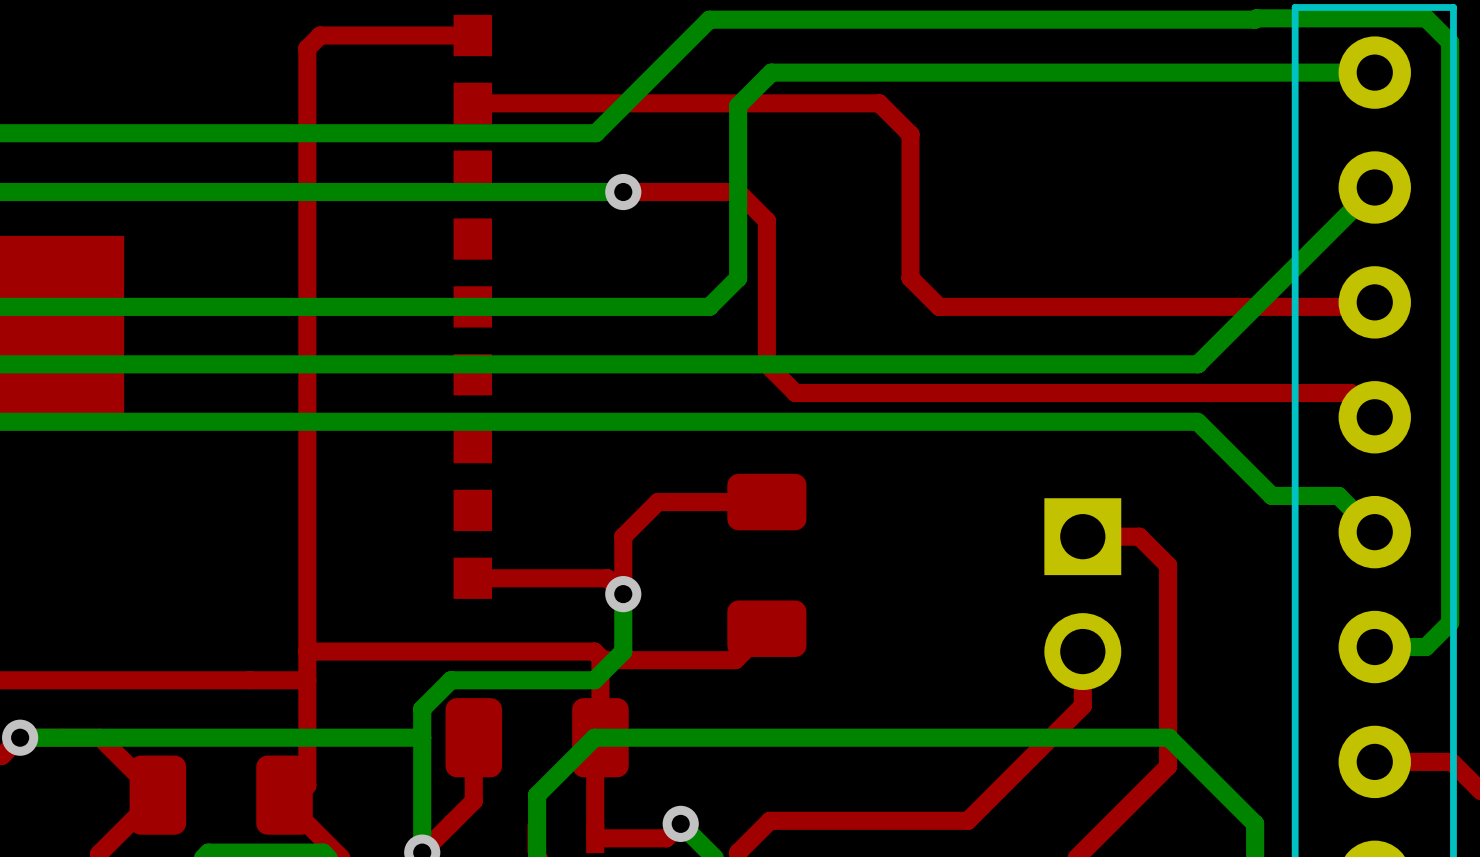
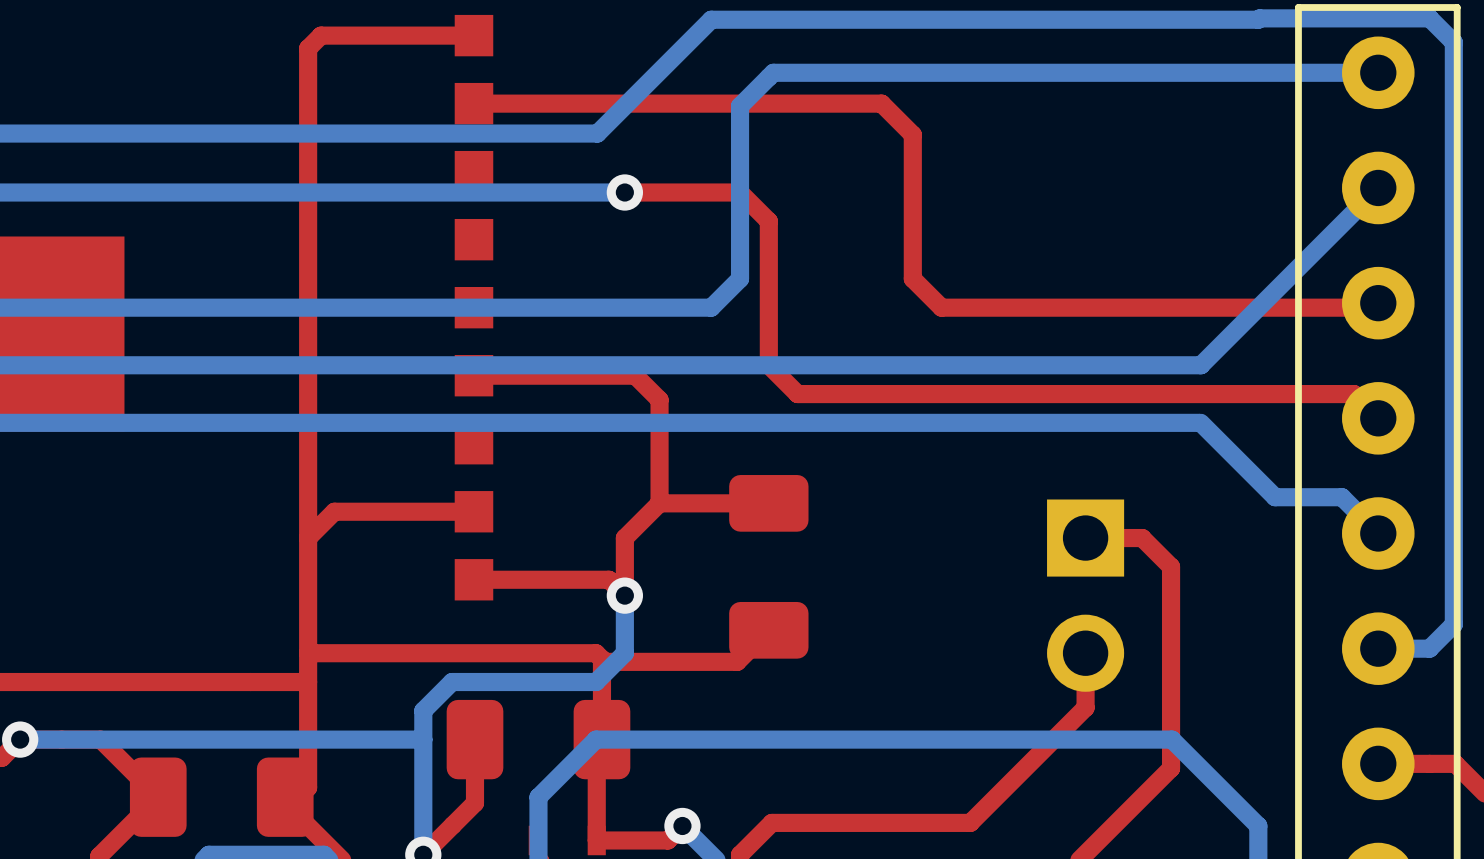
top track: none -> (473, 375) (635, 375) (659, 399) (659, 503)
top track: none -> (473, 511) (334, 511) (308, 538)

